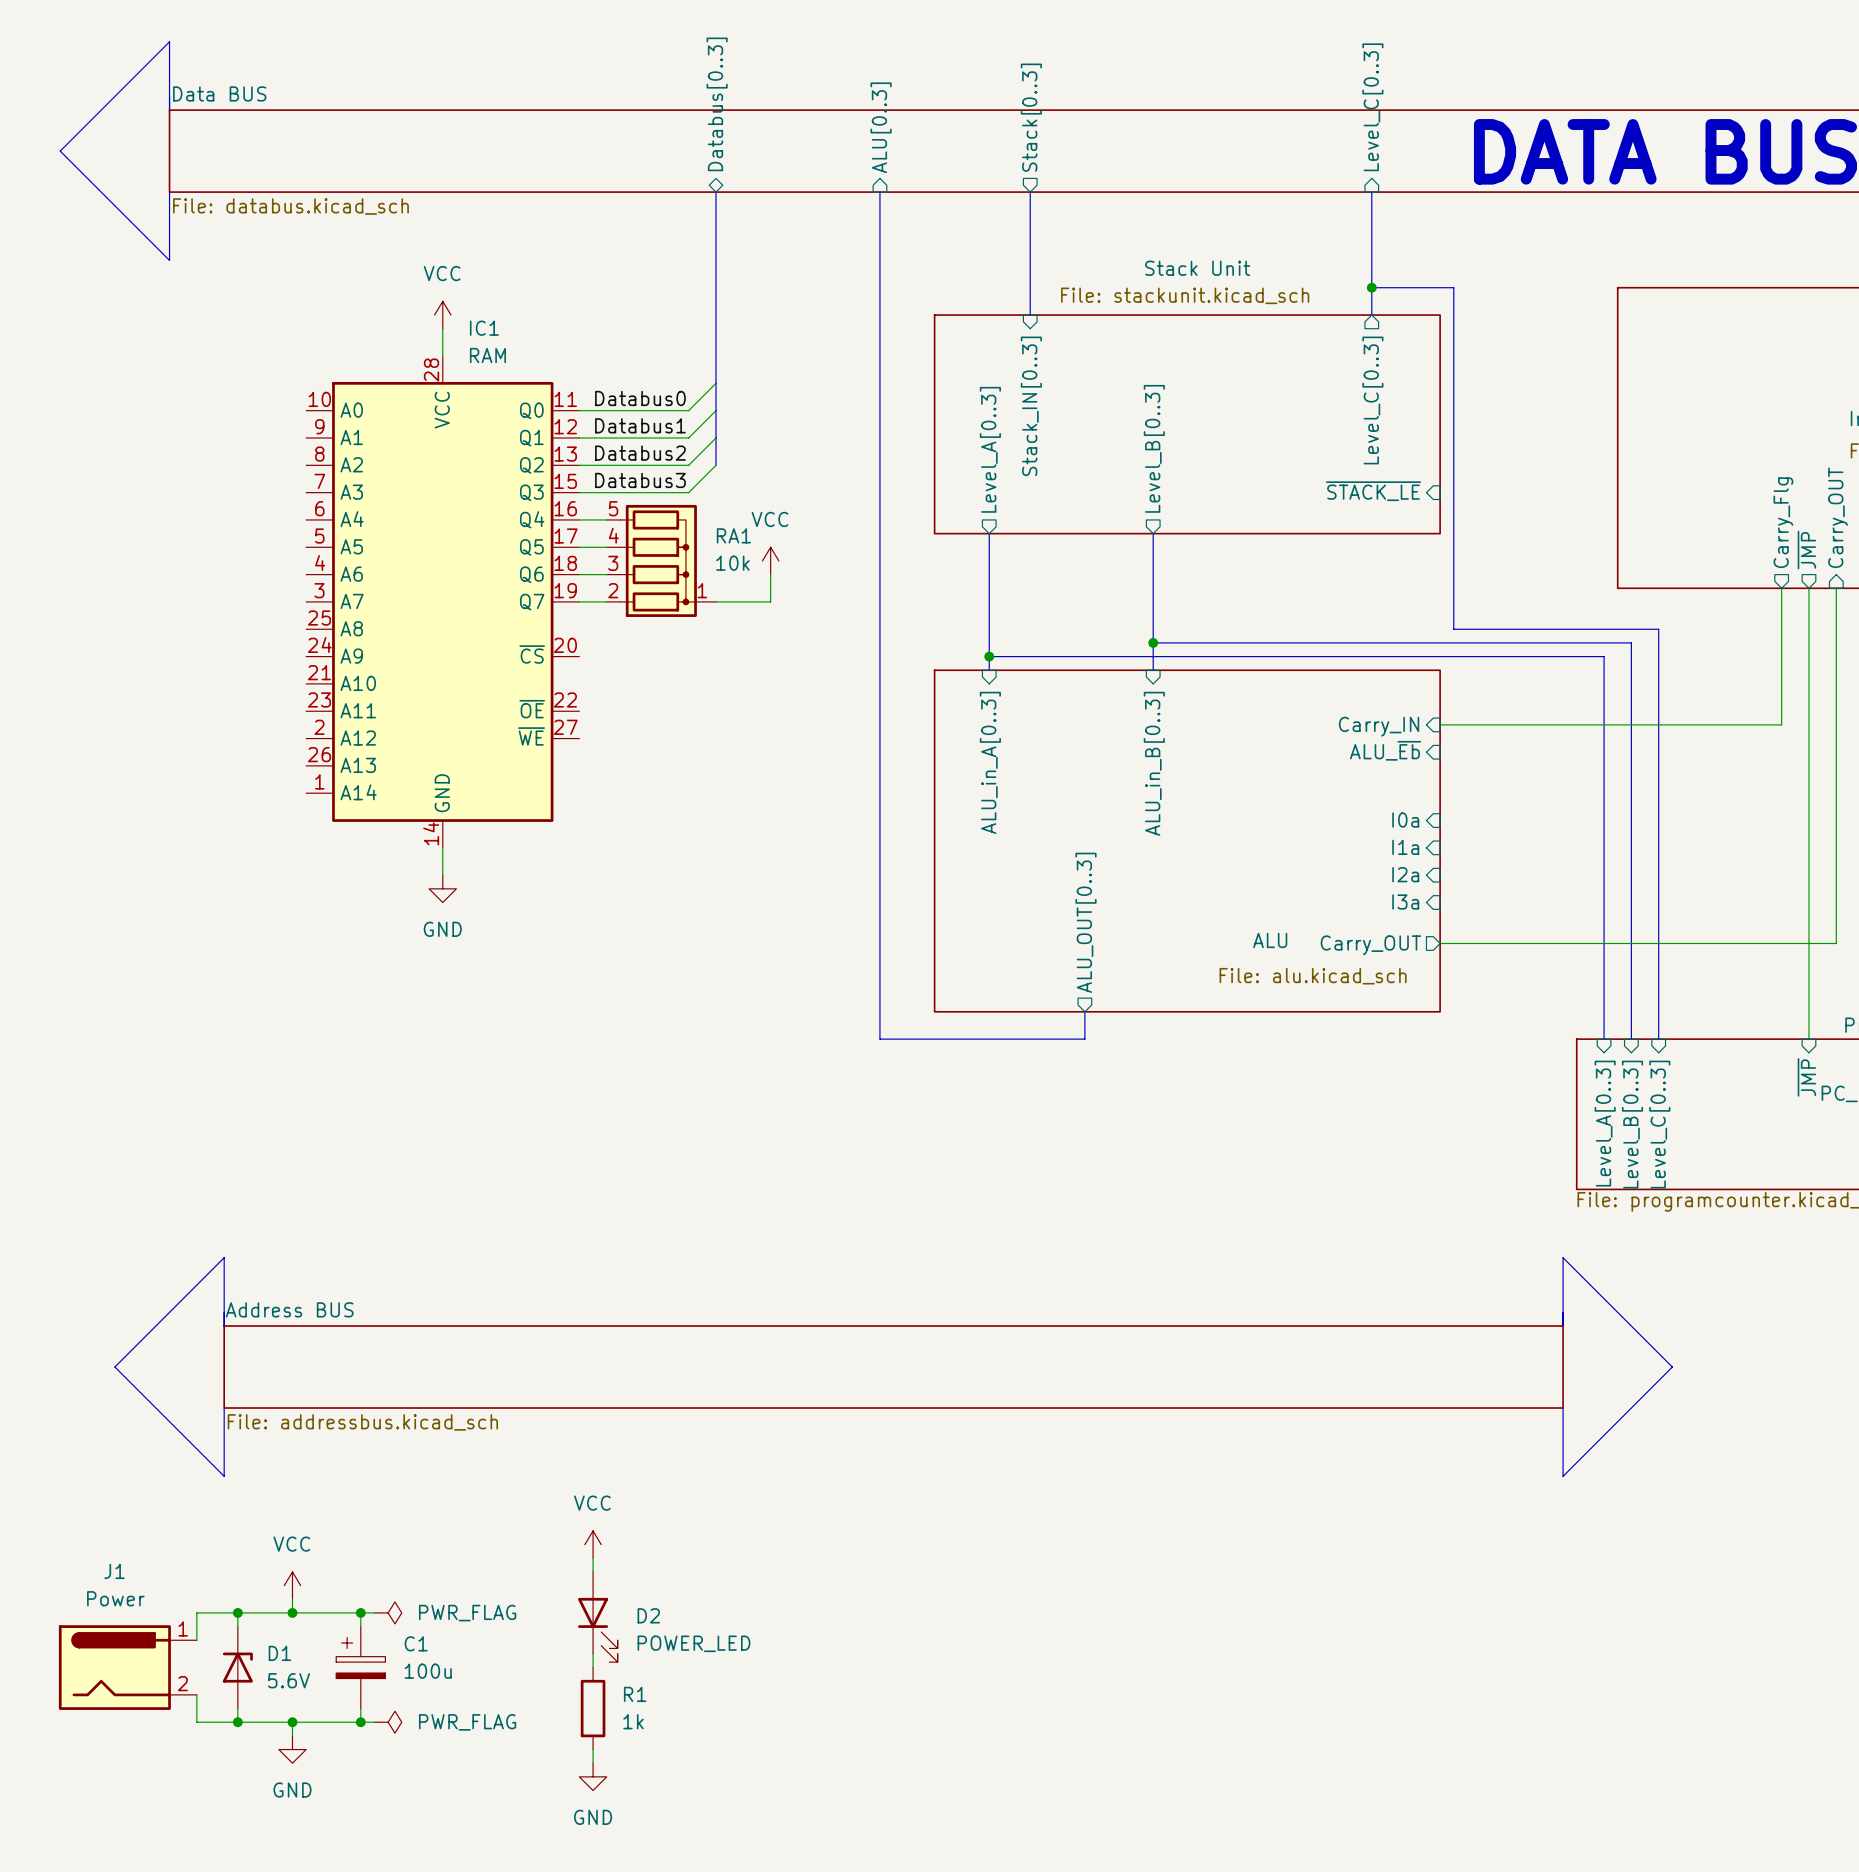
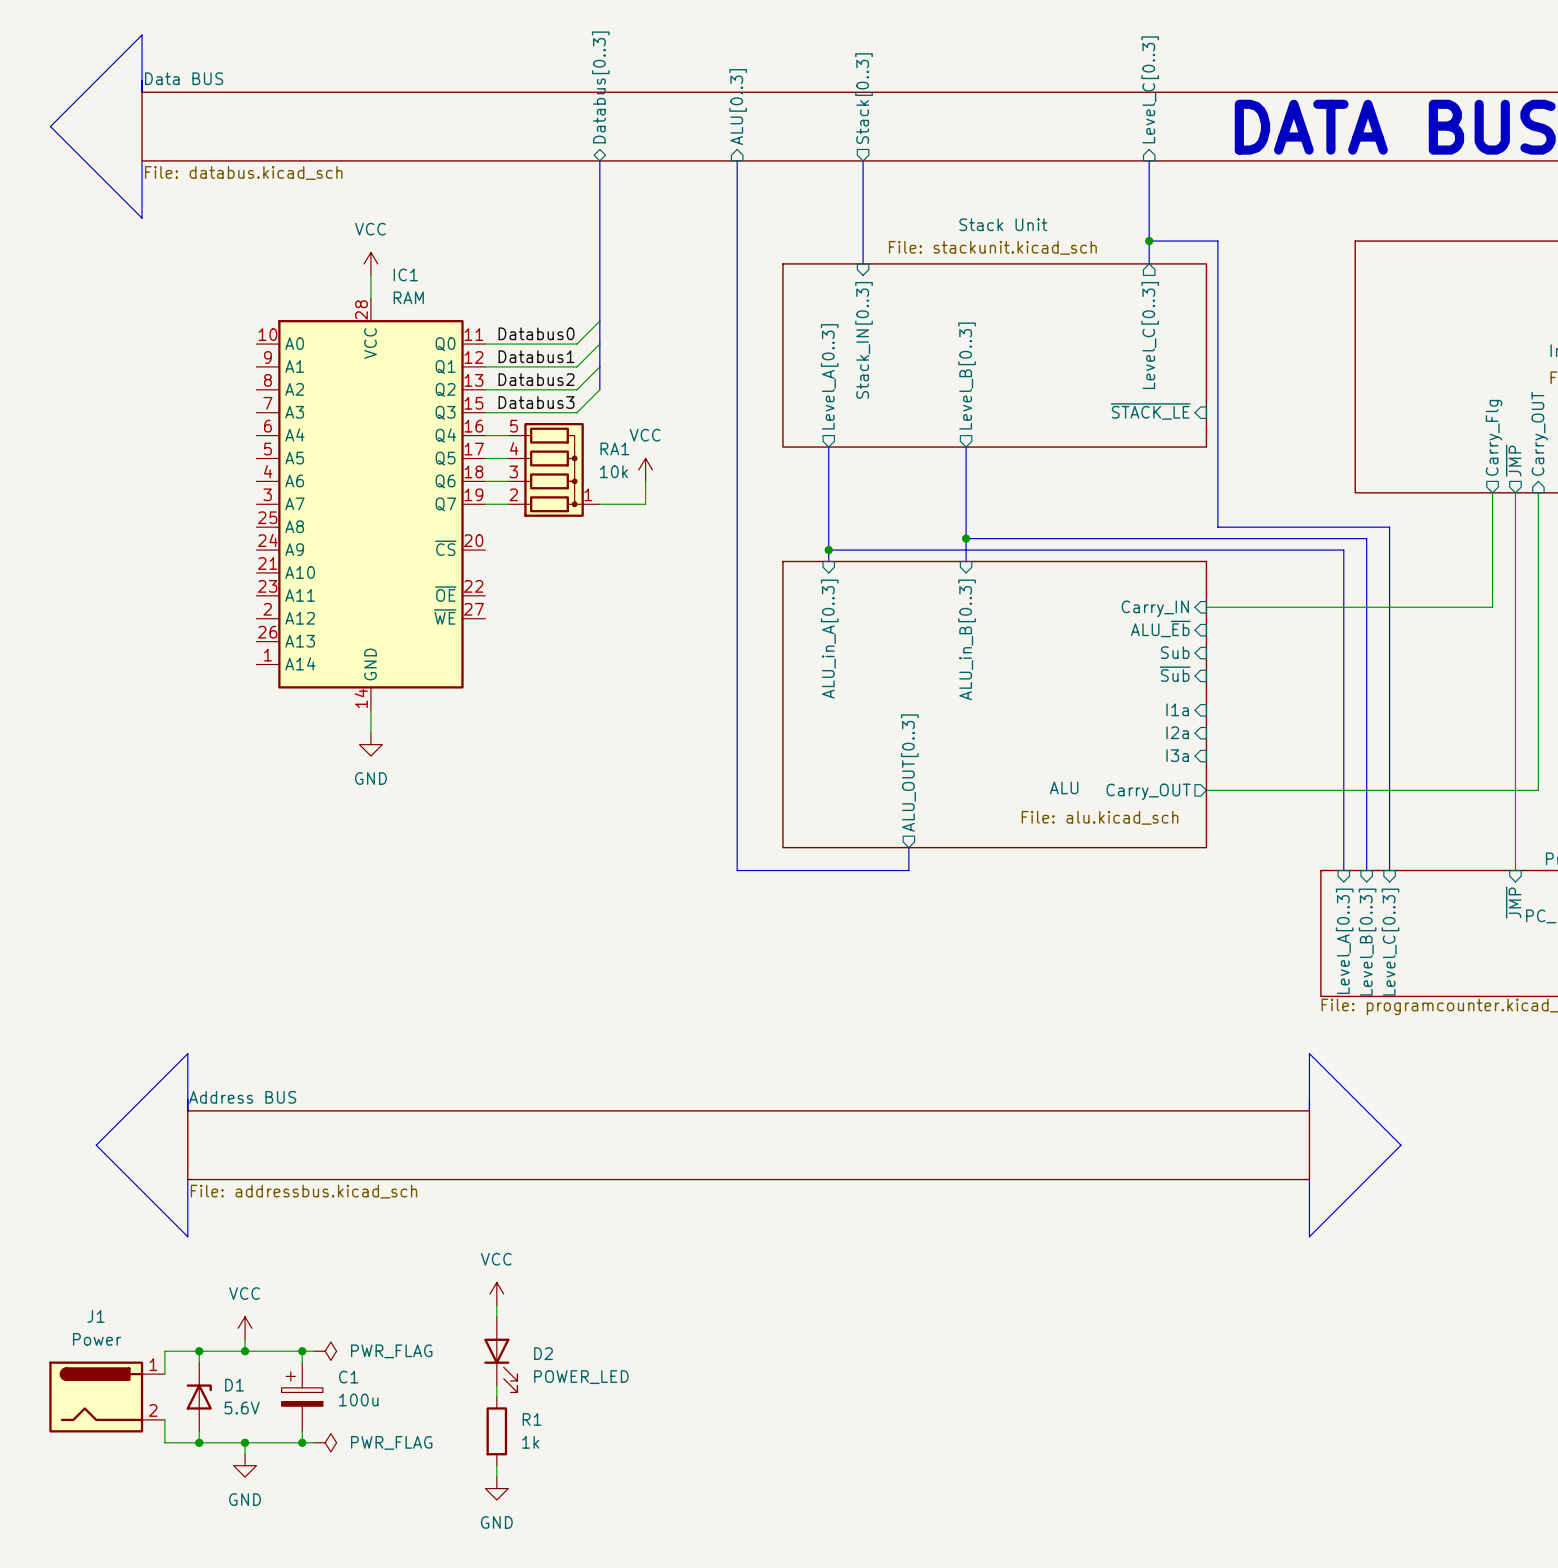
sheet pin: none -> Sub (1175, 652)
sheet pin: none -> ~{Sub} (1175, 674)
sheet pin: I0a (1405, 820) -> none

